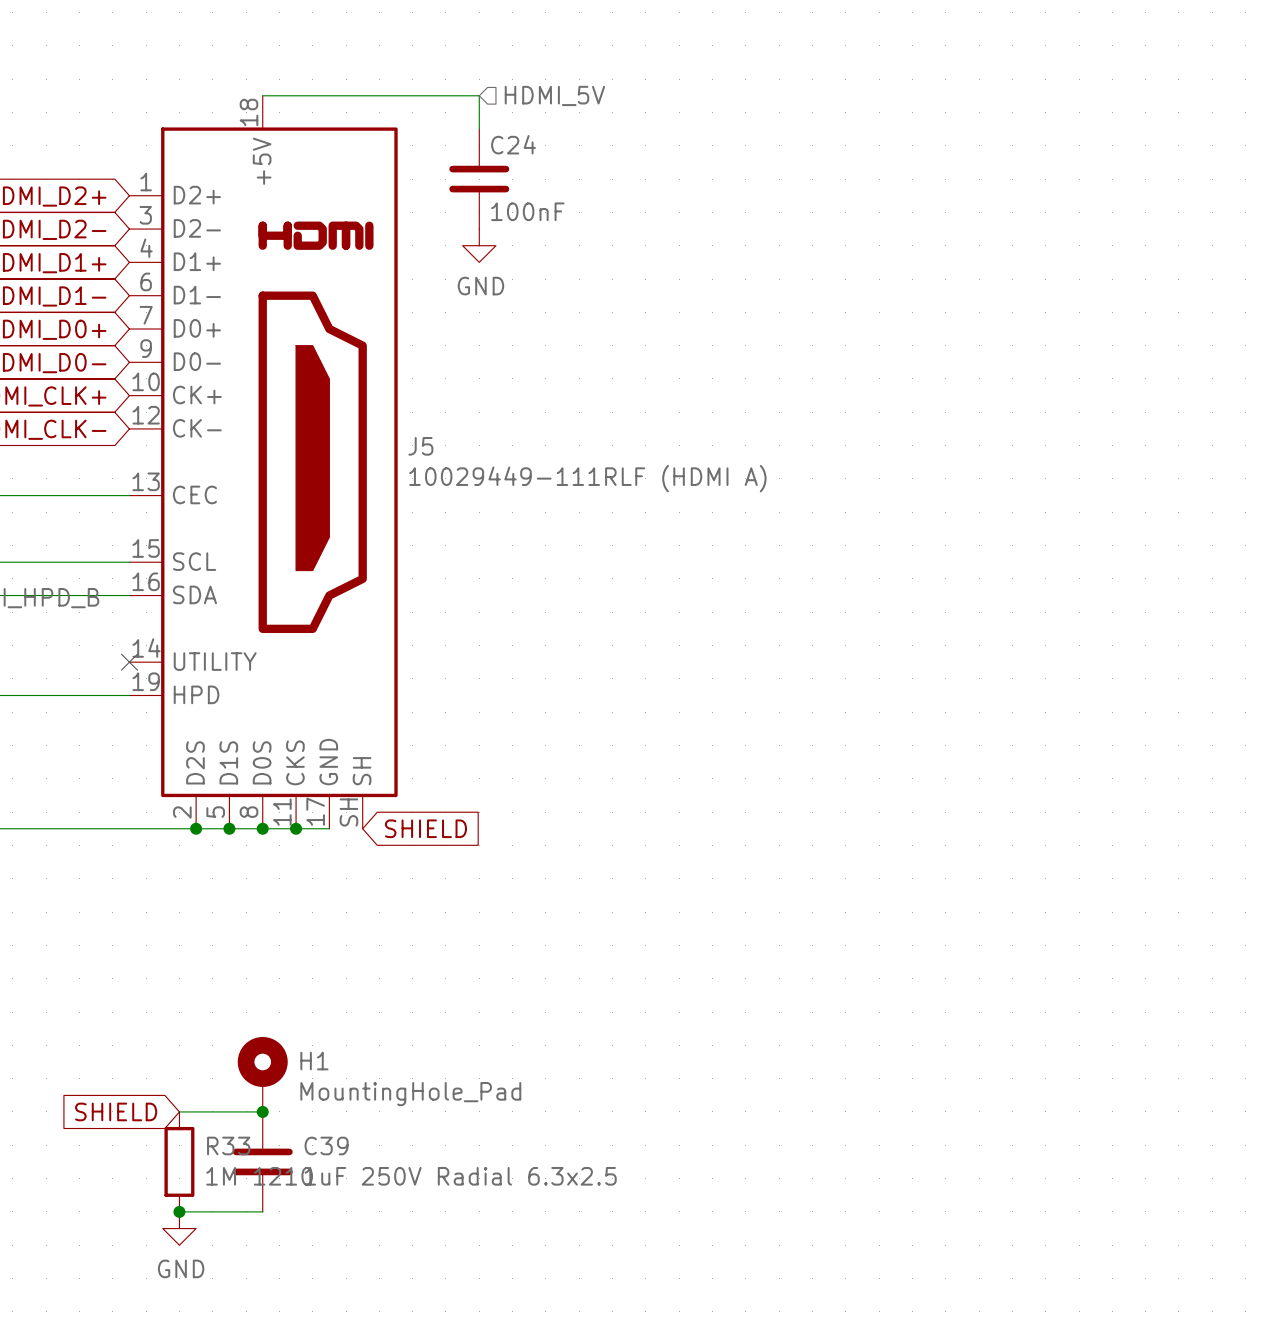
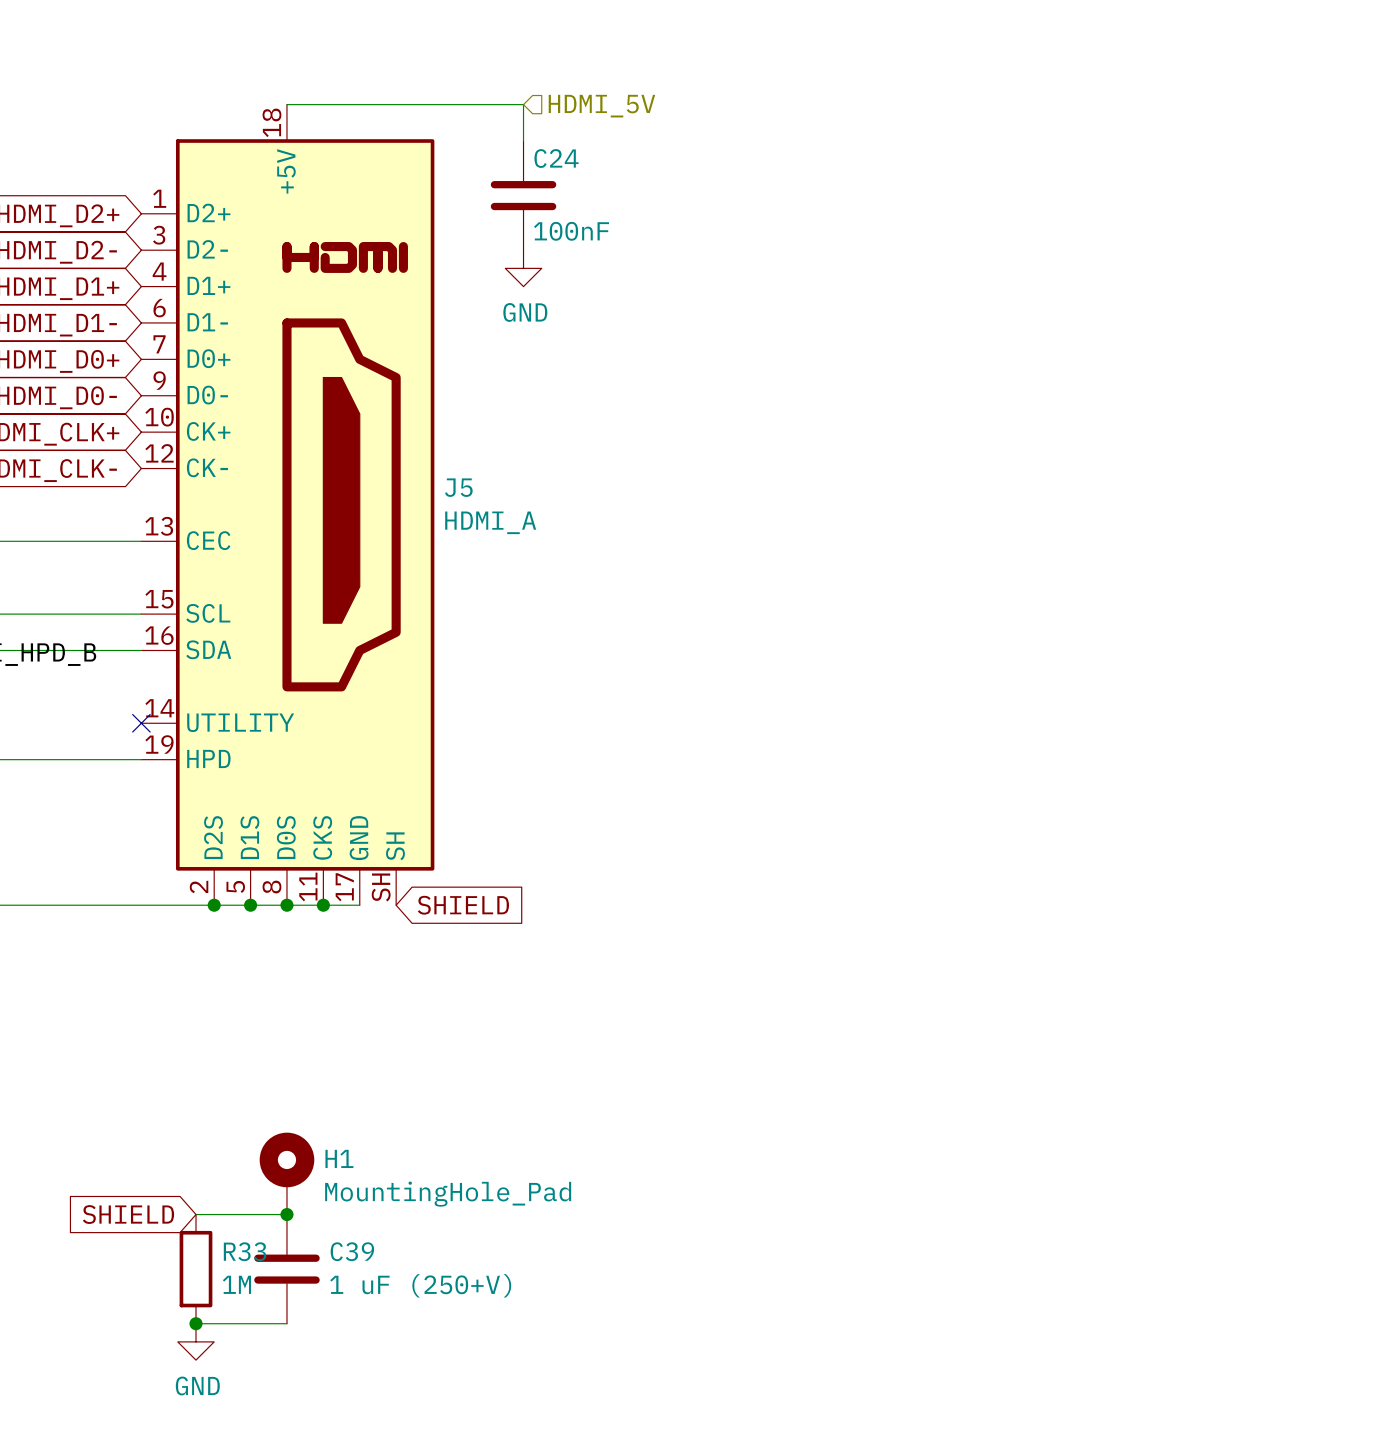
J5 value: 10029449-111RLF (HDMI A) (587, 478) -> HDMI_A (490, 522)
R33 value: 1M 1210 (259, 1176) -> 1M (236, 1284)
C39 value: 1uF 250V Radial 6.3x2.5 (460, 1176) -> 1 uF (250+V) (420, 1285)

